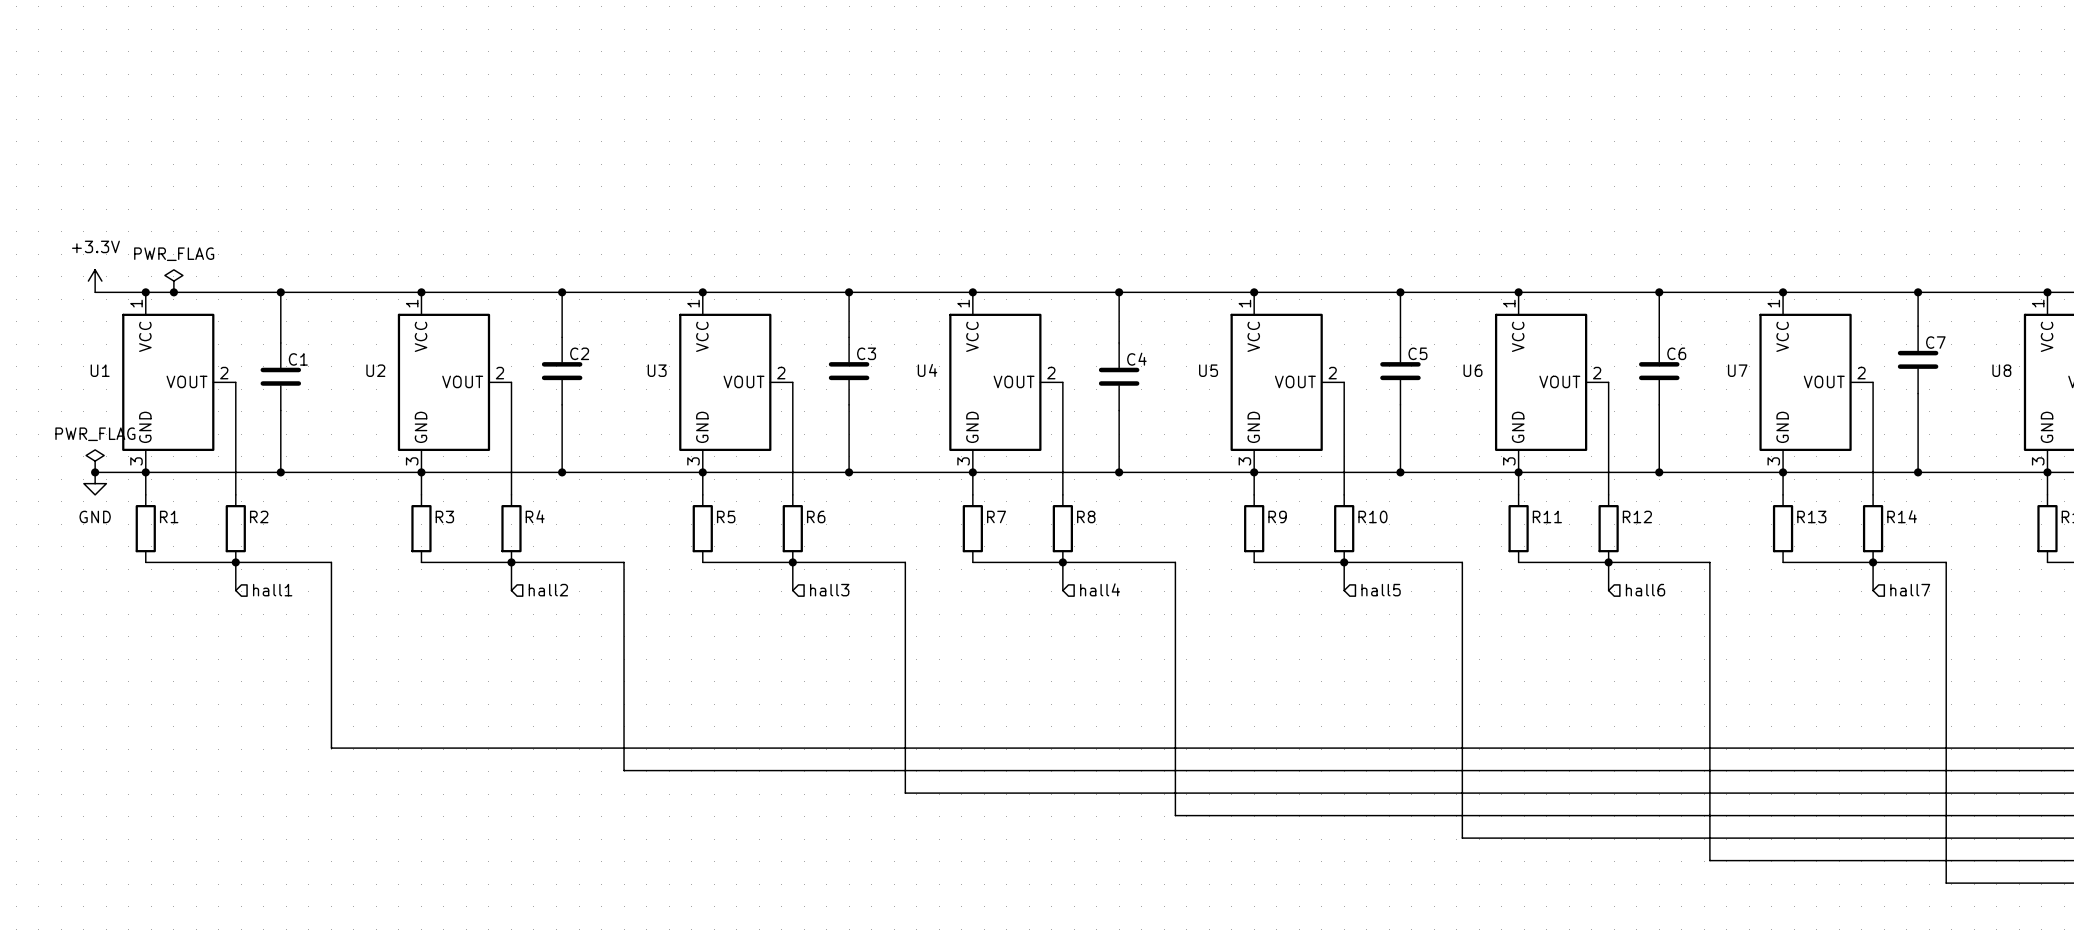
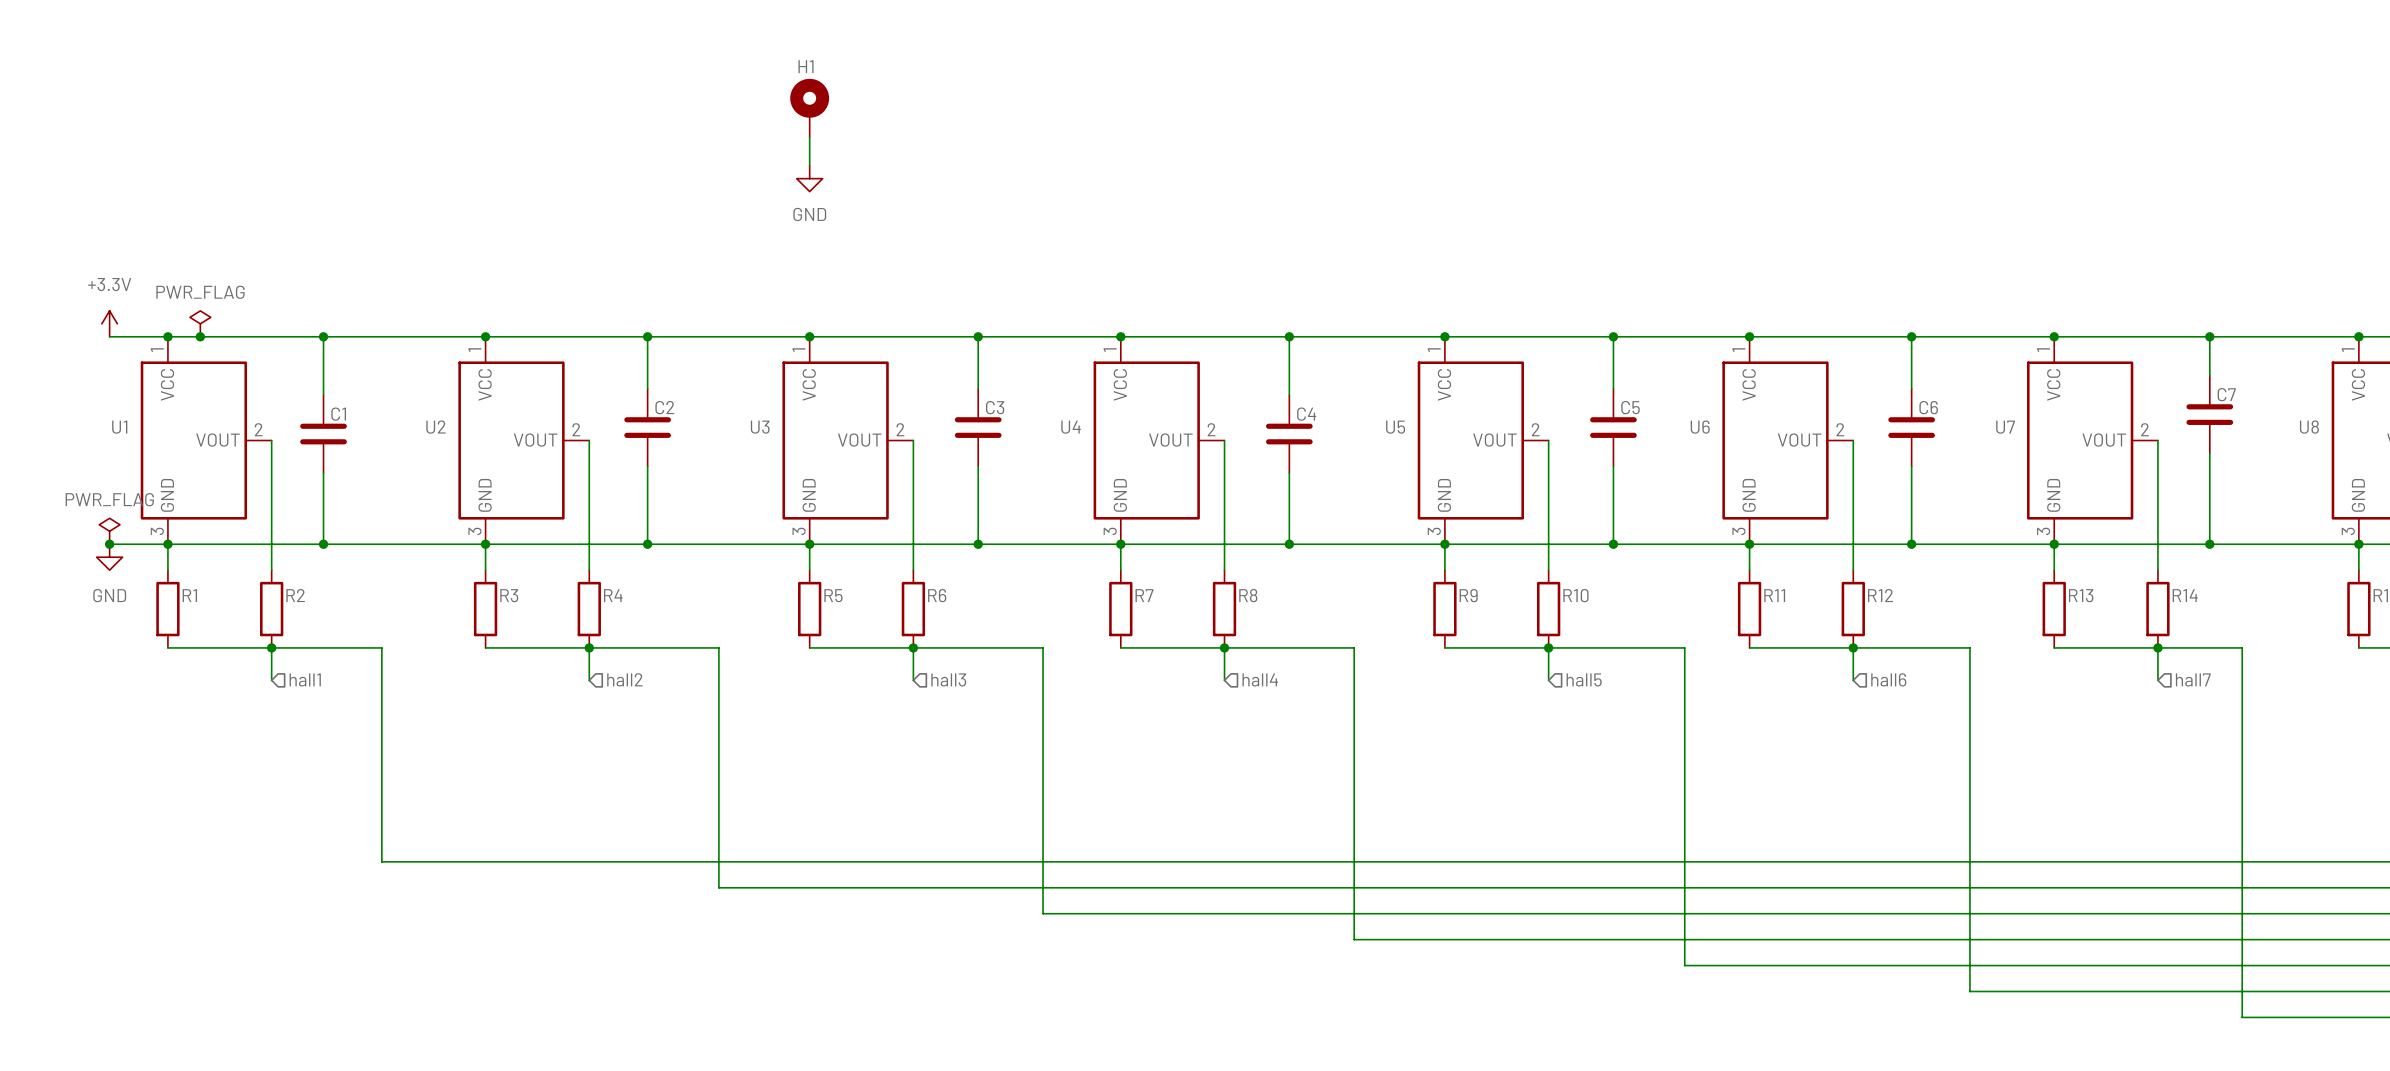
H1: none -> (809, 107)
wire: none -> (809, 137) (809, 165)
power symbol: none -> GND (809, 178)

